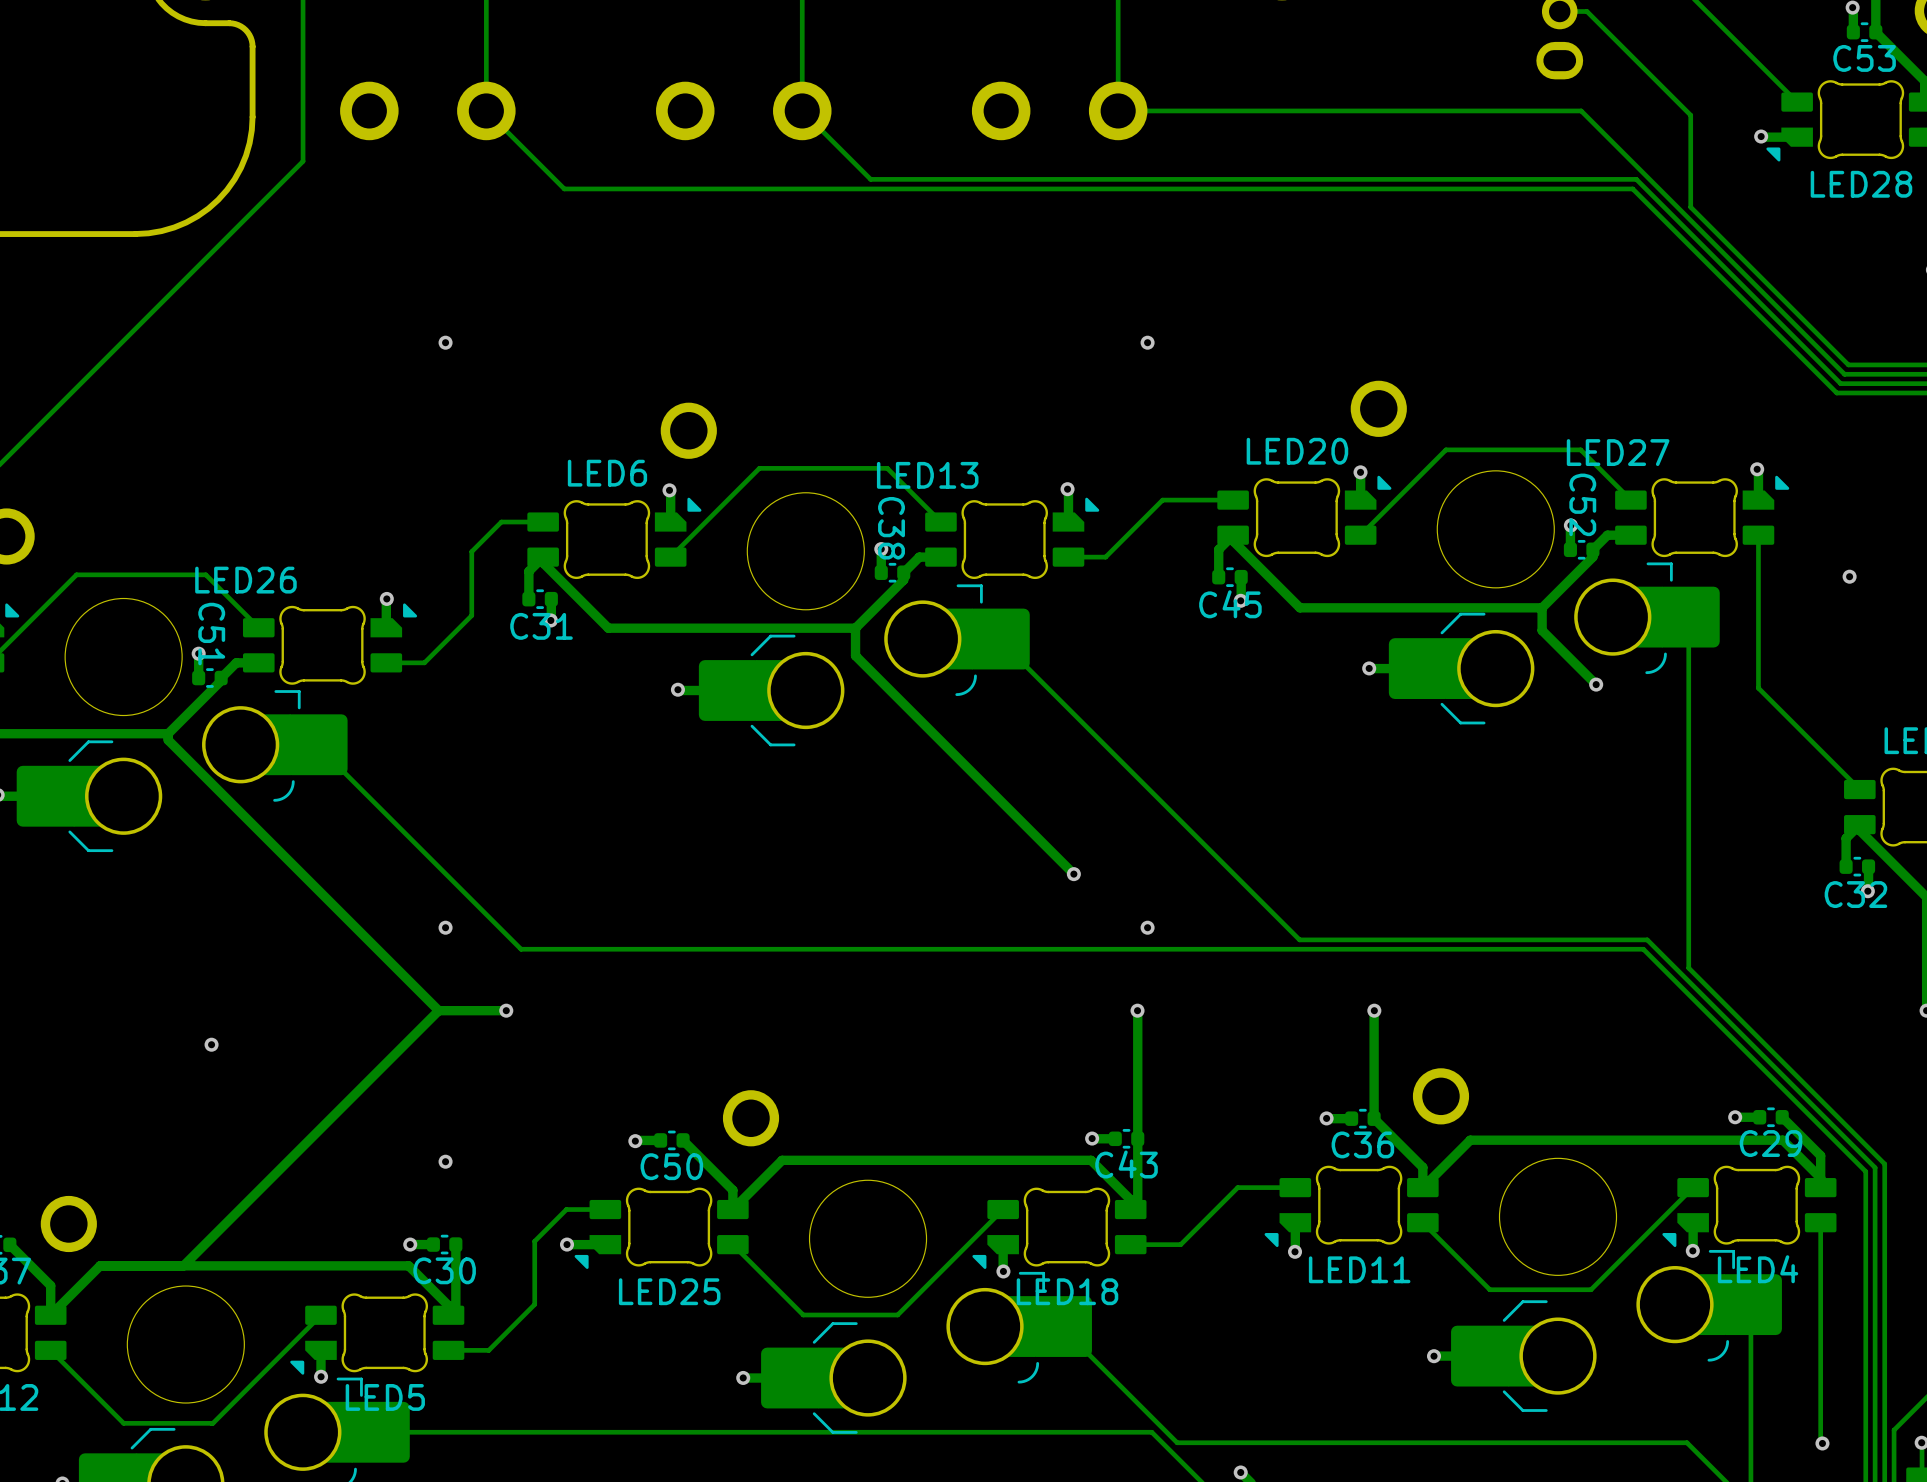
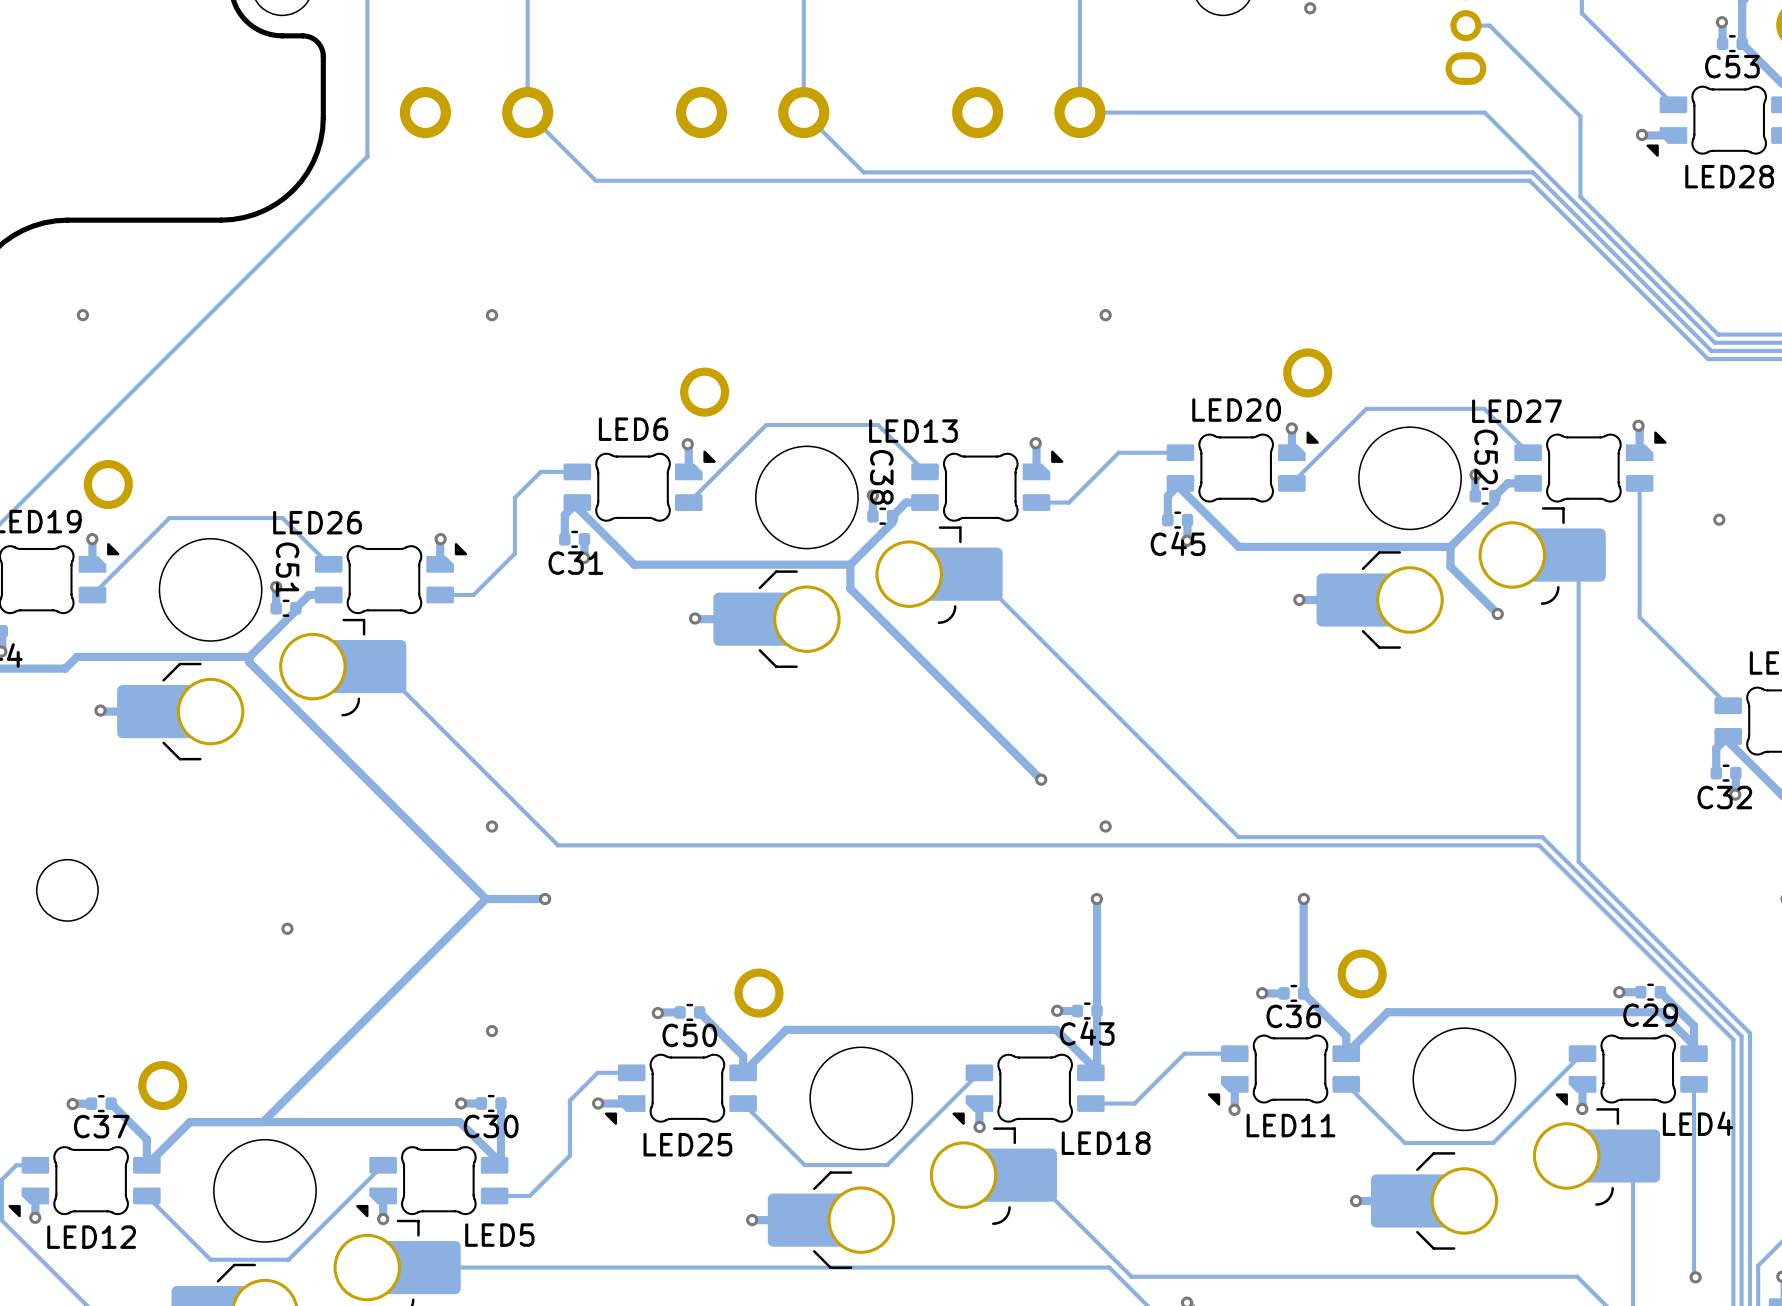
LED4 name position: LED4 (1758, 1269) -> LED4 (1697, 1123)
LED18 name position: LED18 (1067, 1291) -> LED18 (1106, 1143)
LED5 name position: LED5 (385, 1397) -> LED5 (499, 1235)

